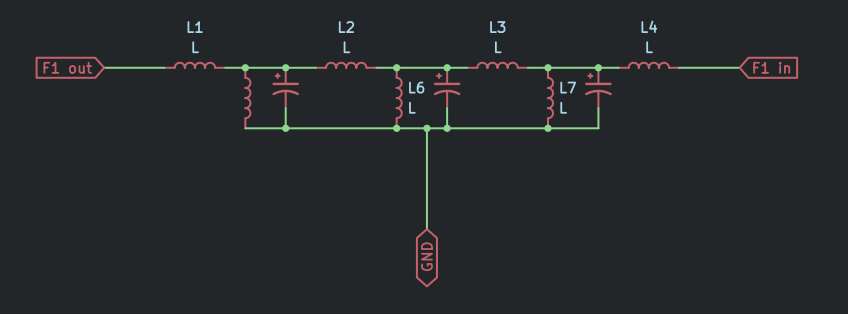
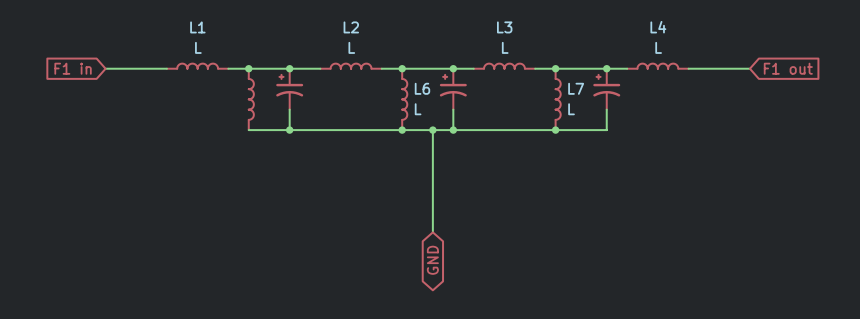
global label: F1 out (67, 67) -> F1 in (73, 68)
global label: F1 in (771, 67) -> F1 out (788, 68)

